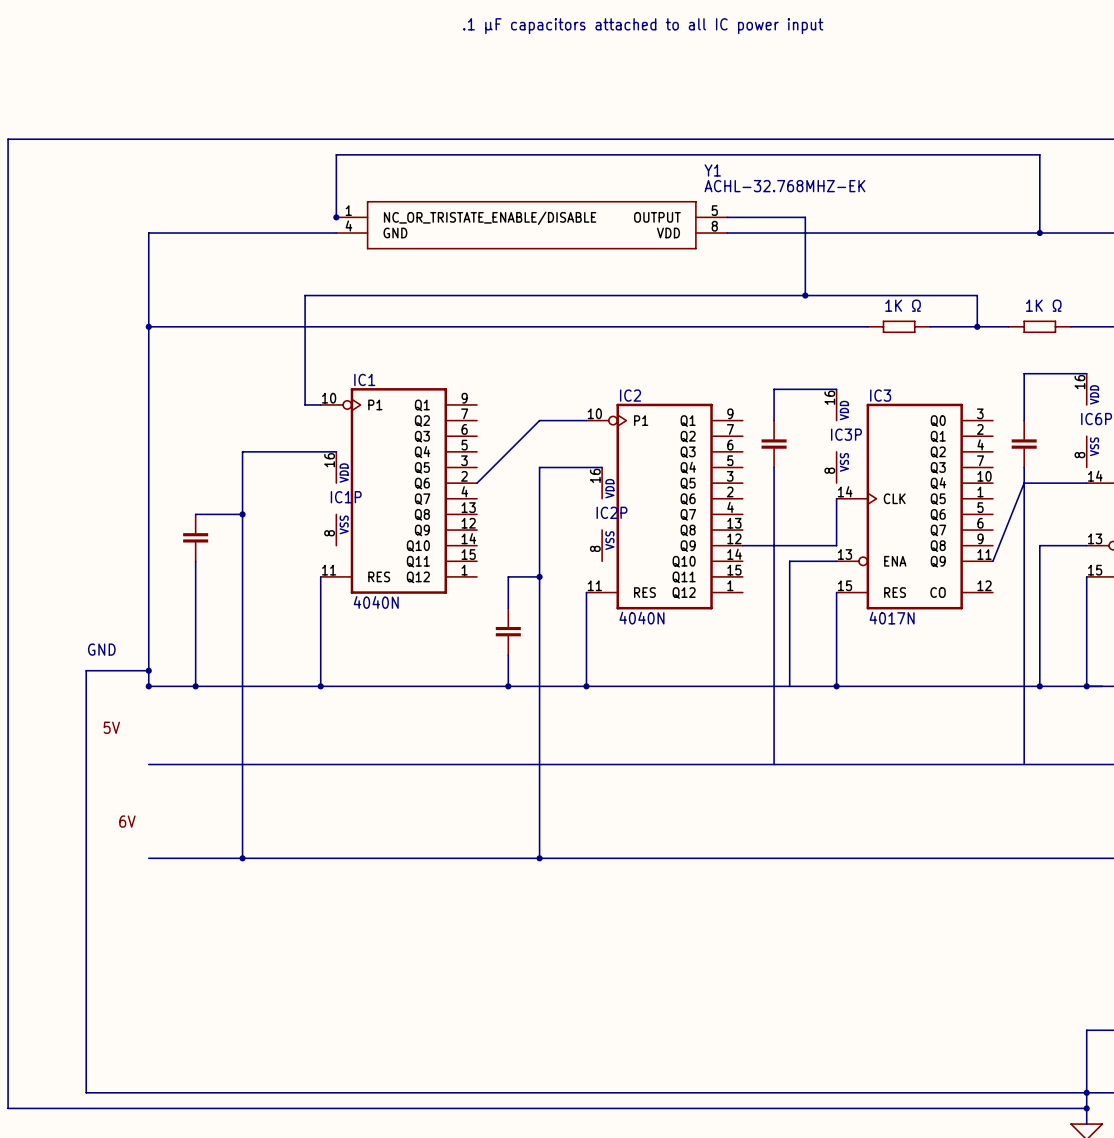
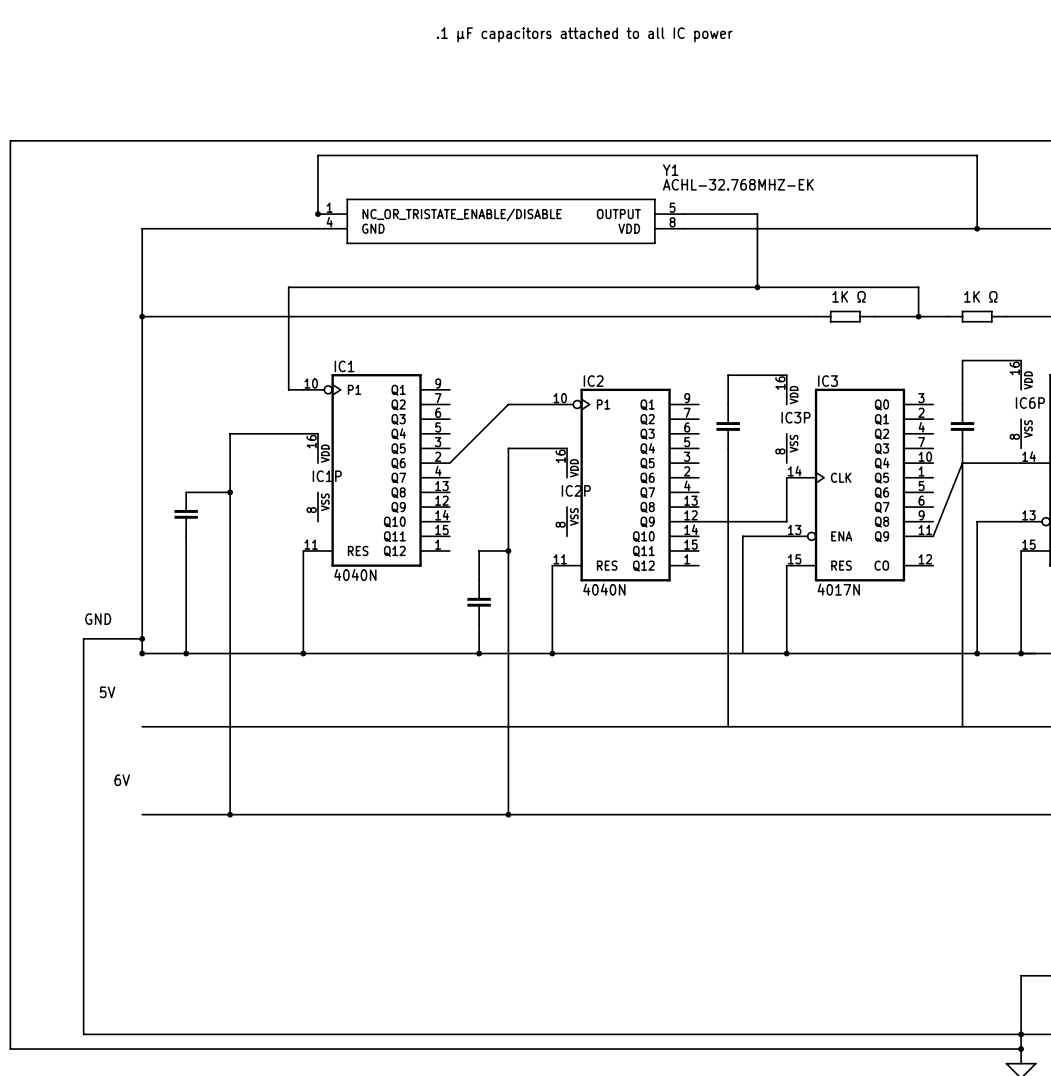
text: .1 µF capacitors attached to all IC power input (643, 26) -> .1 µF capacitors attached to all IC power (584, 34)

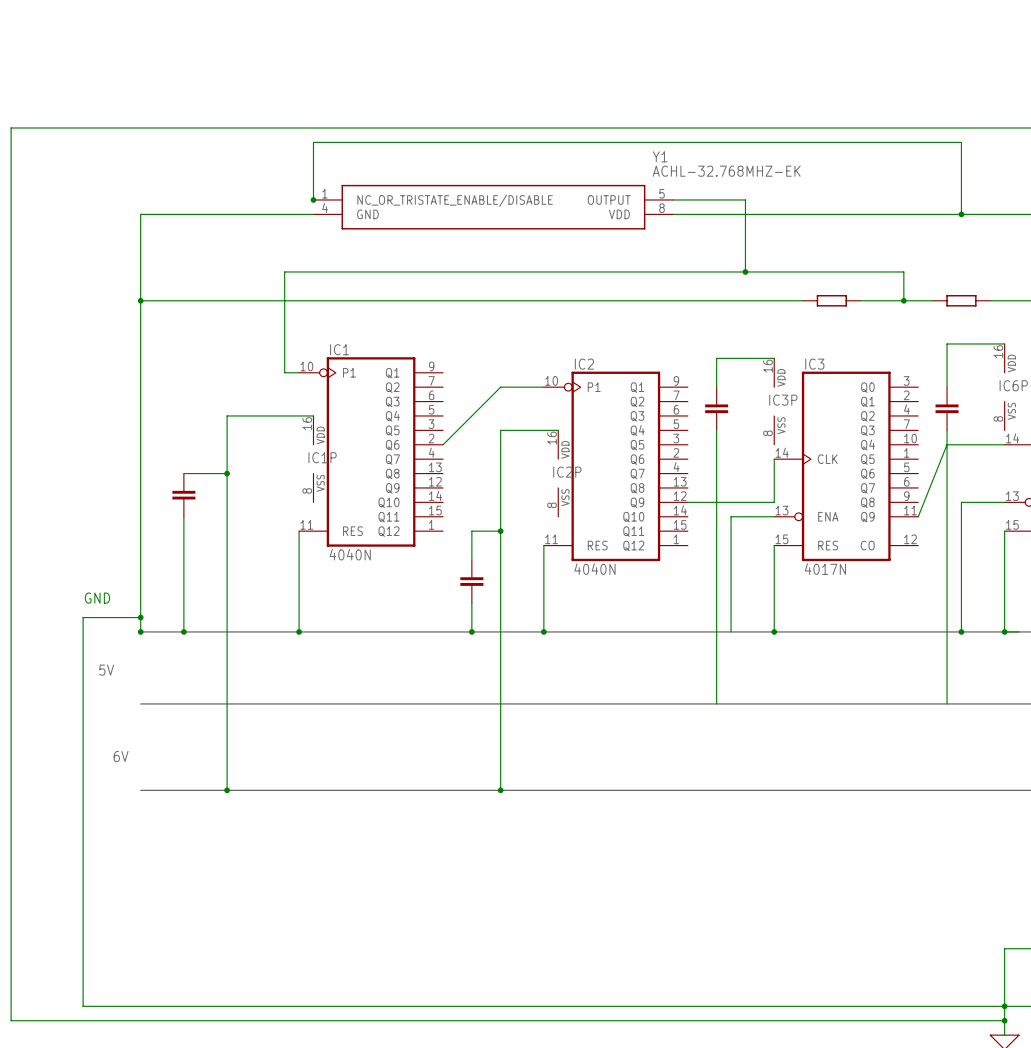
text: .1 µF capacitors attached to all IC power (584, 34) -> none
text: 1K Ω (849, 296) -> none
text: 1K Ω (980, 296) -> none

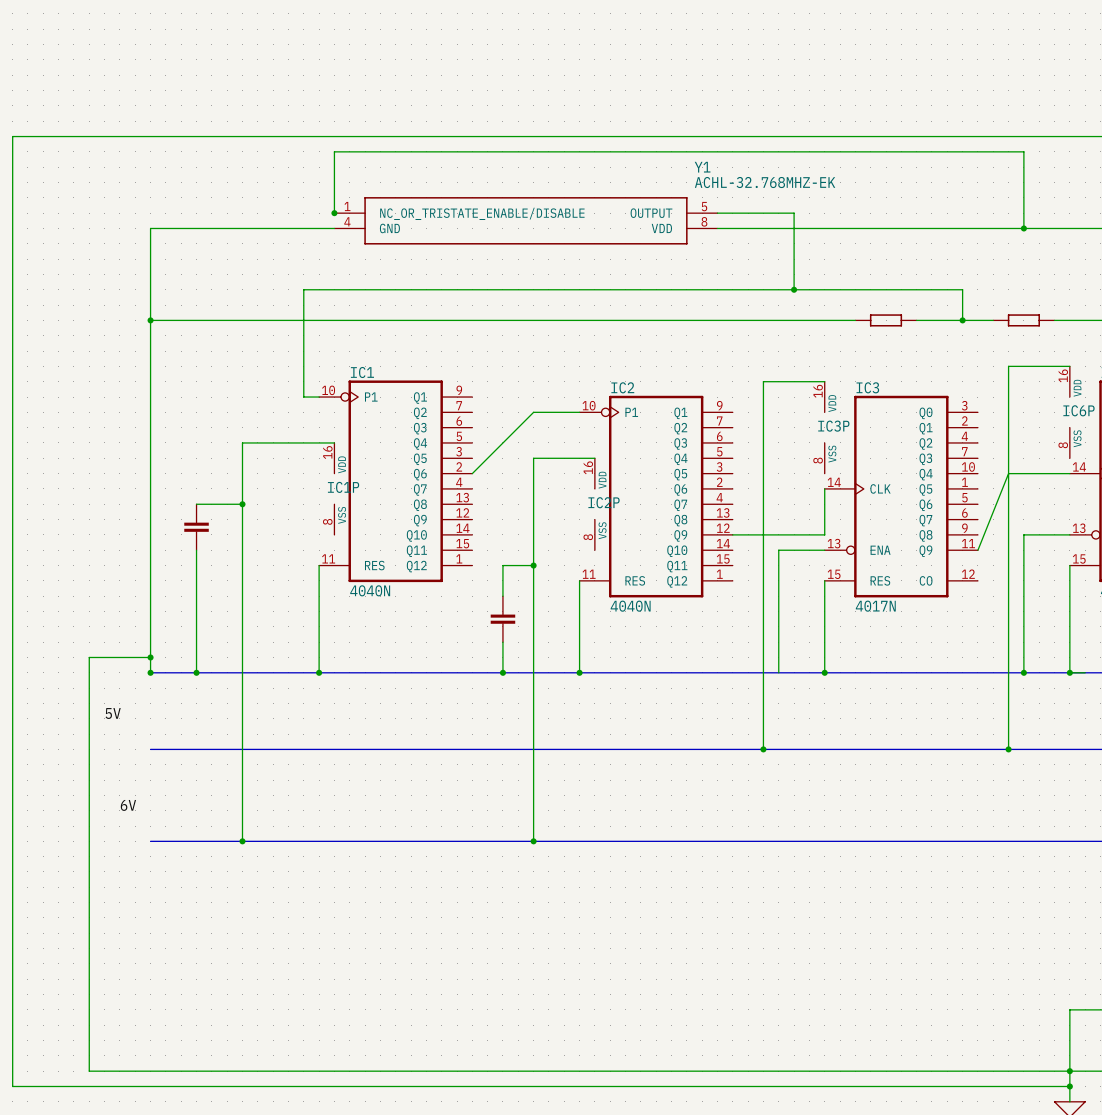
part: (716, 408) -> none
part: (947, 408) -> none
text: GND (97, 598) -> none
junction: none -> (763, 749)
junction: none -> (1008, 749)

